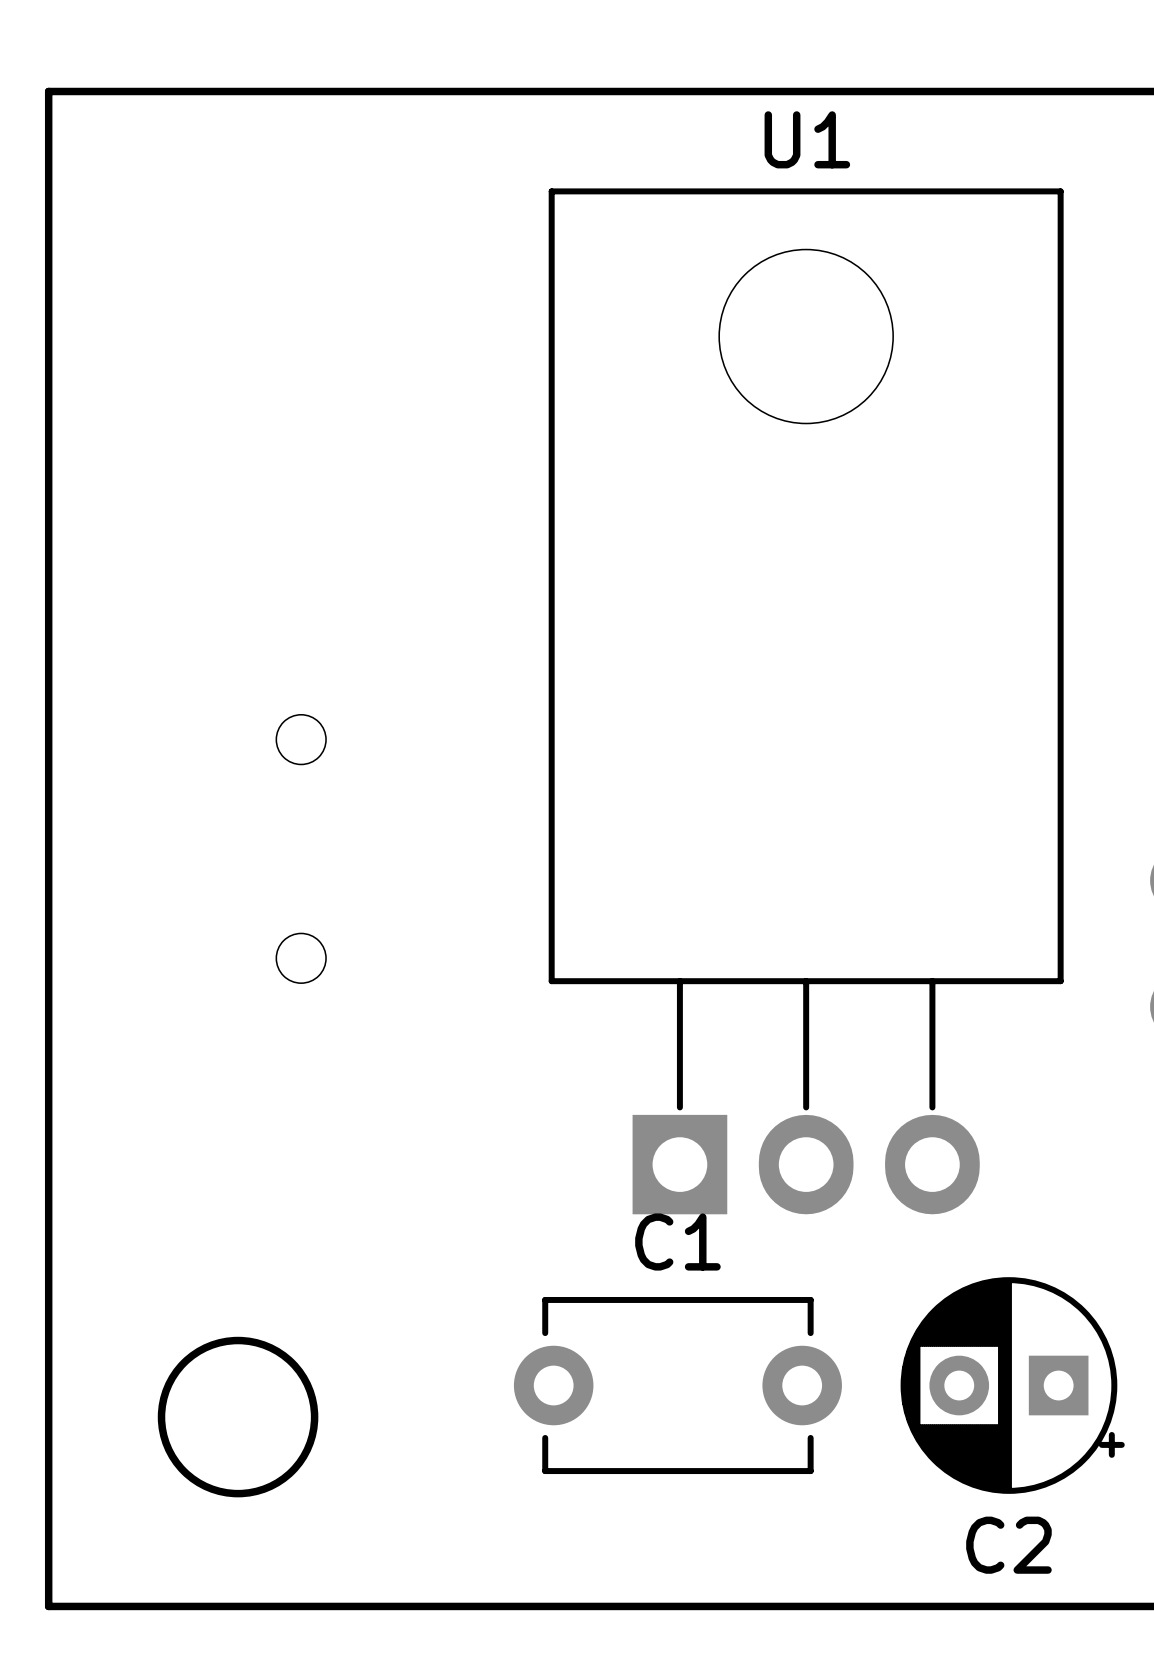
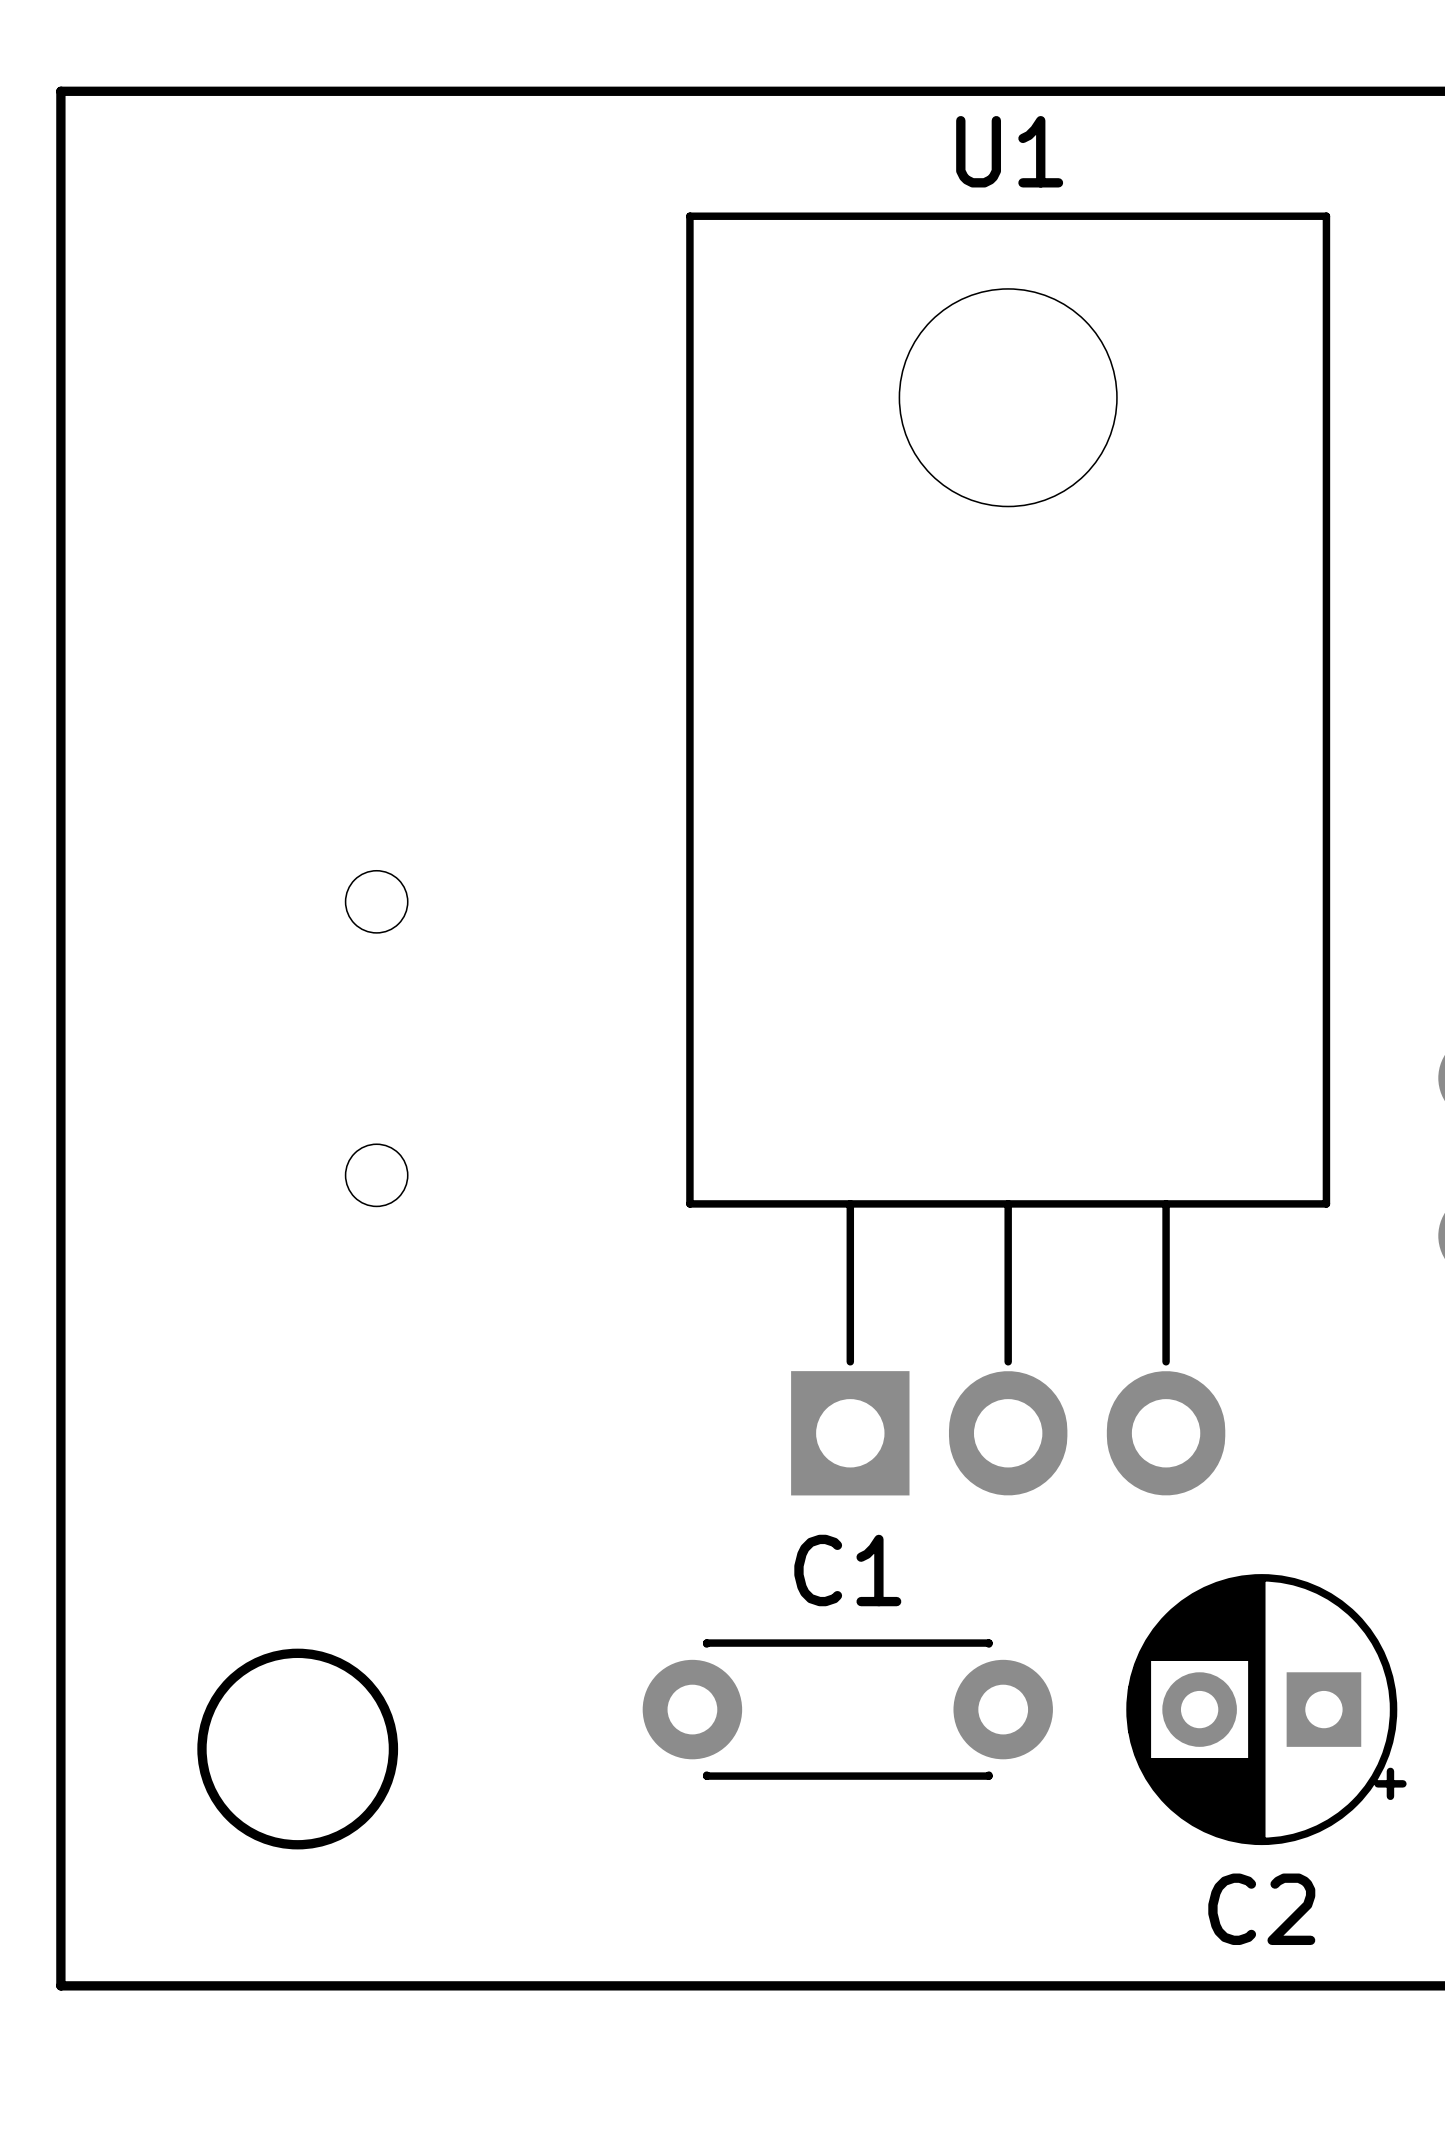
C1 name position: C1 (677, 1242) -> C1 (847, 1570)
C1 footprint: [513, 1296, 842, 1475] -> [642, 1639, 1053, 1780]

